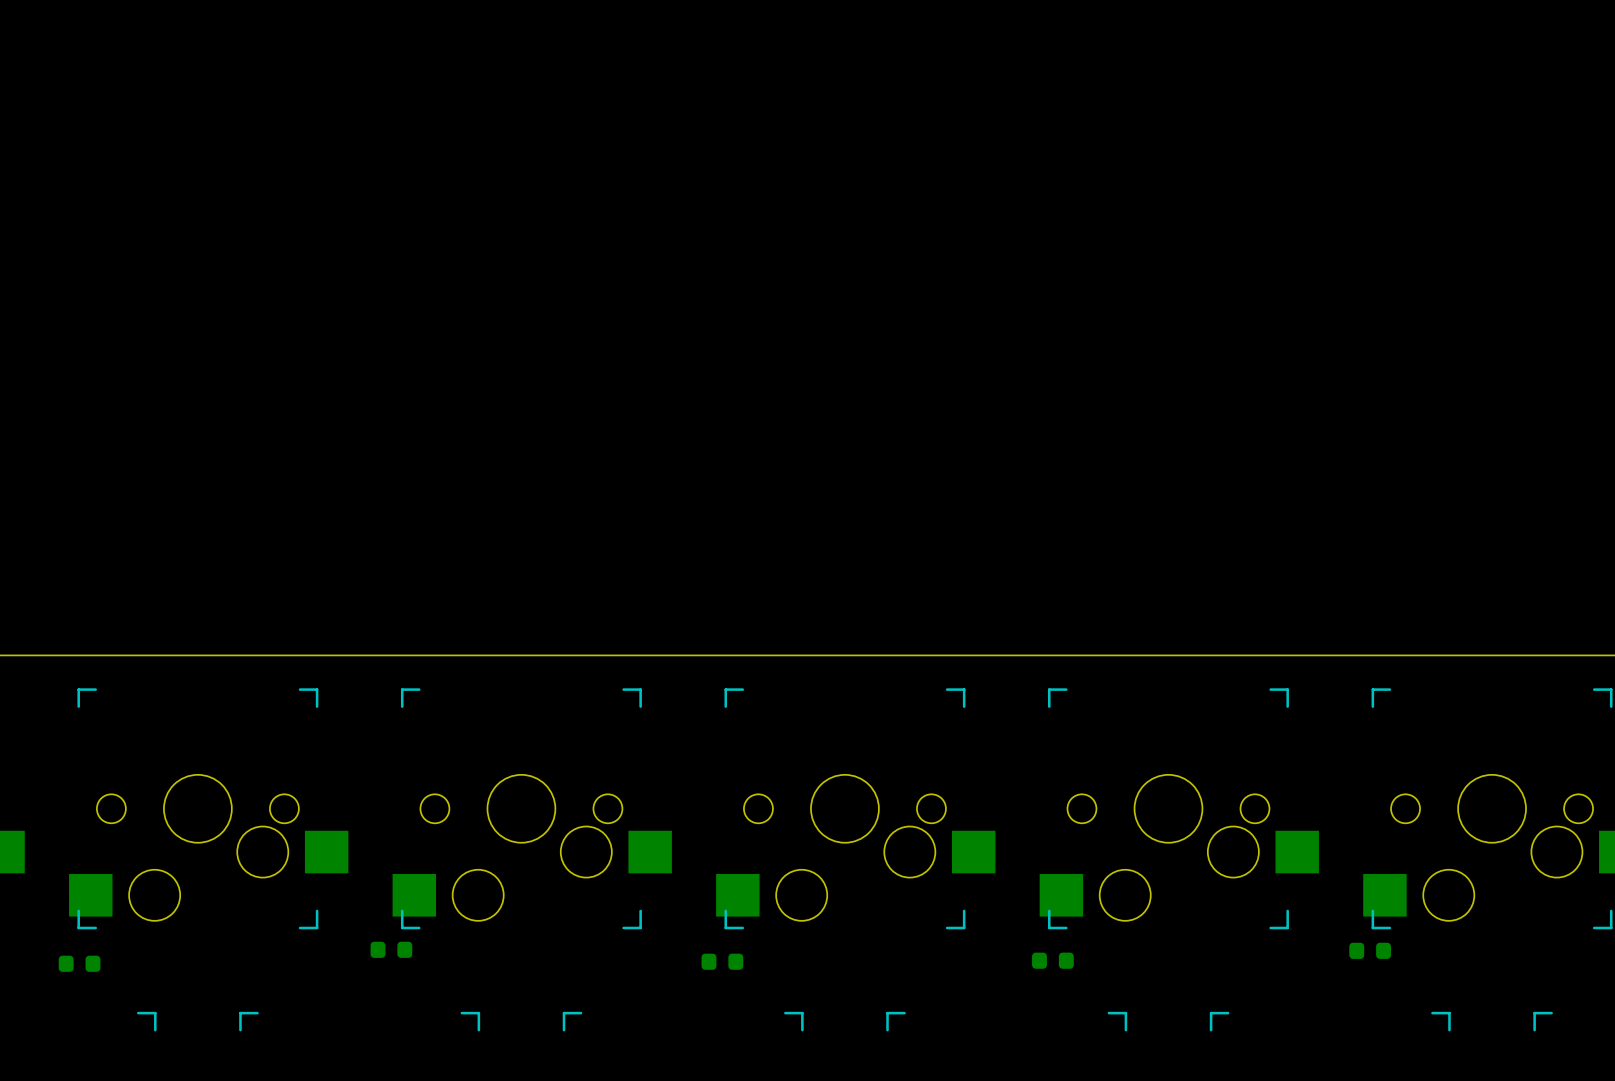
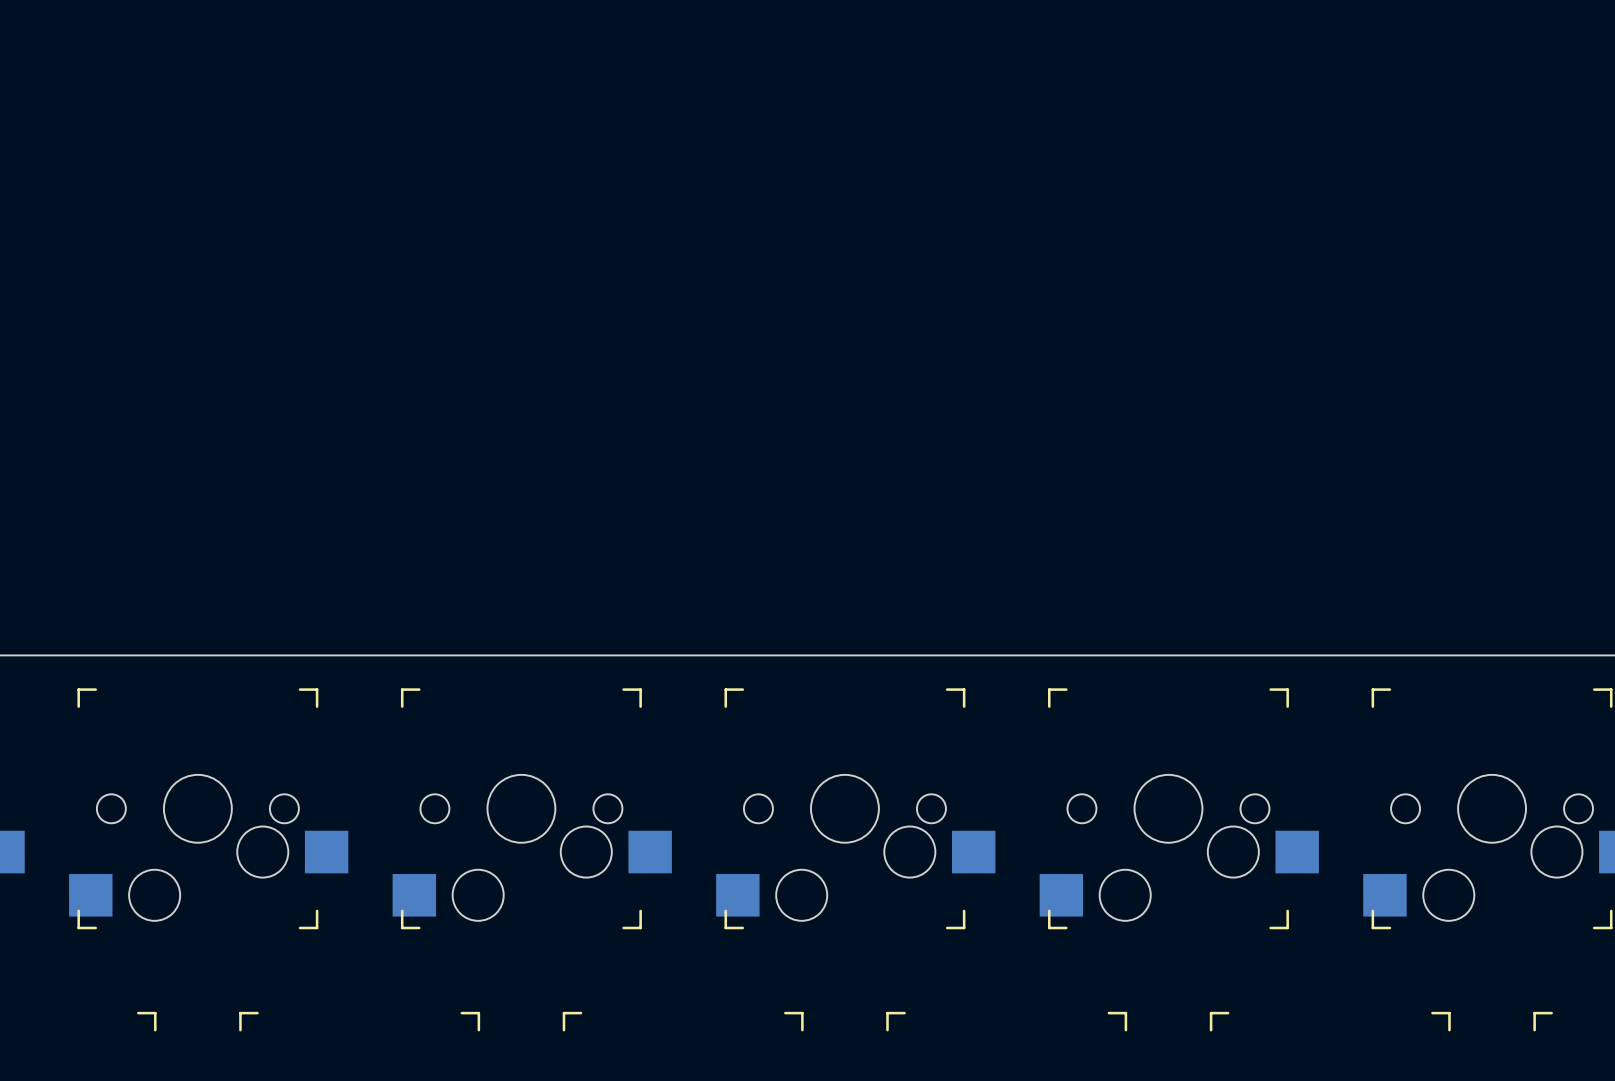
part: (391, 949) -> none
part: (1370, 950) -> none
part: (1052, 960) -> none
part: (722, 961) -> none
part: (79, 963) -> none

